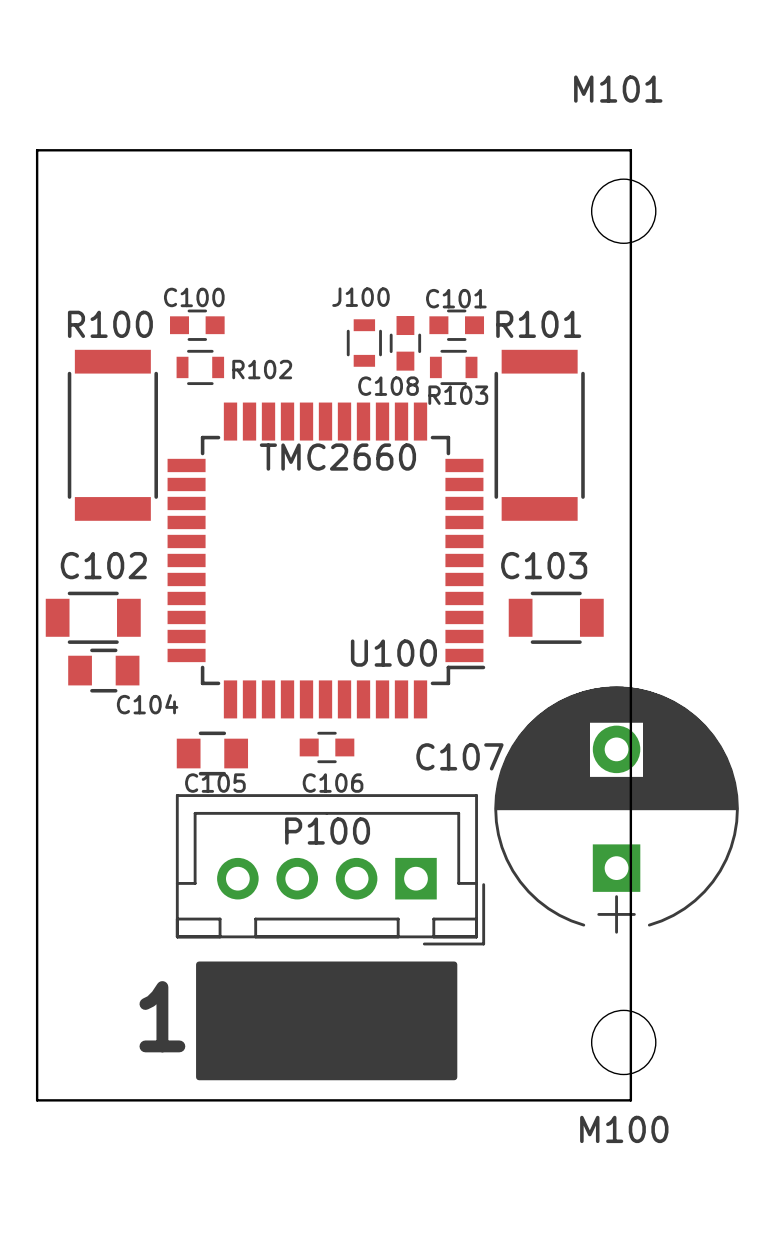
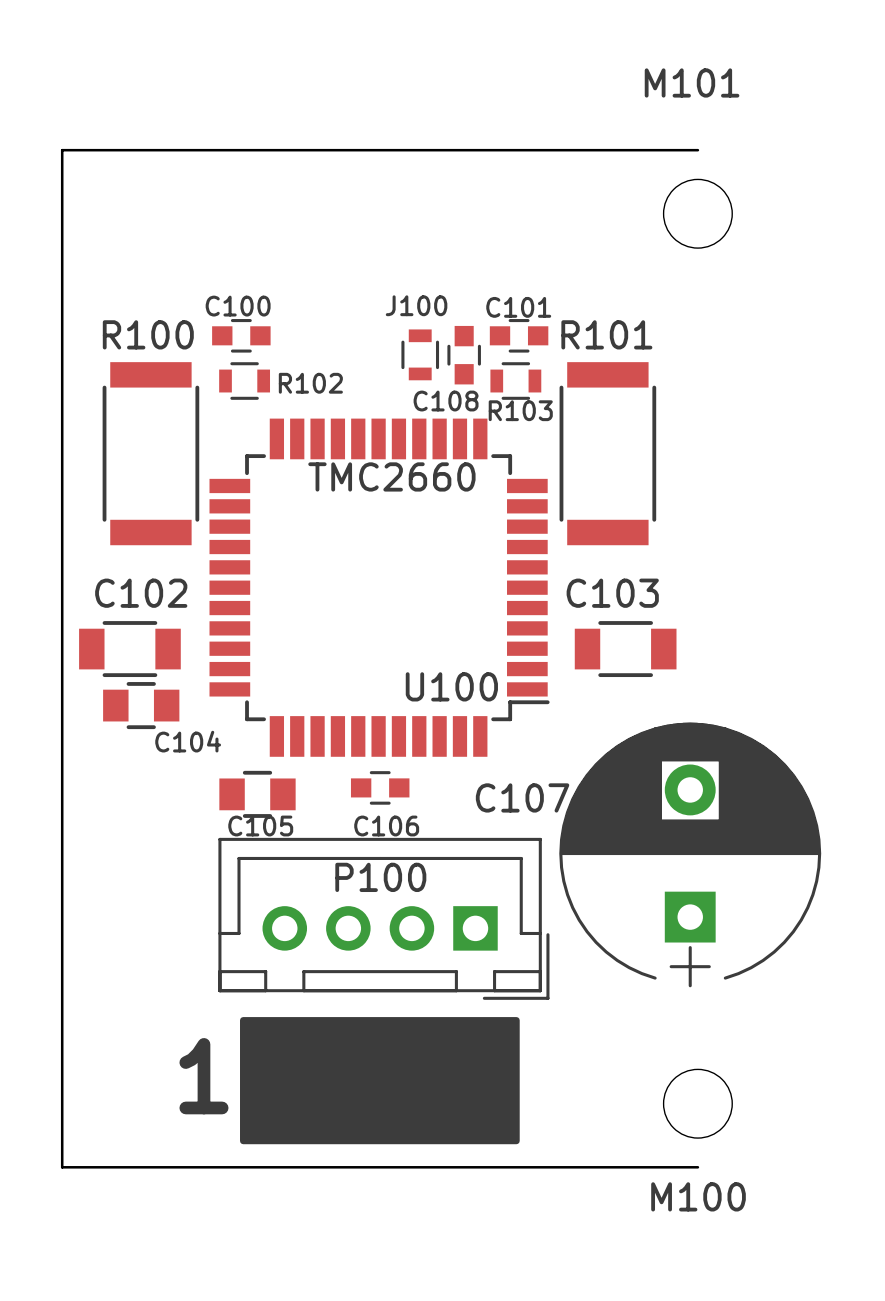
board edge: (37, 150) (630, 150) (630, 1100) (37, 1100) (37, 150) -> none
board edge: none -> (697, 150) (62, 150) (62, 1167) (697, 1167)

